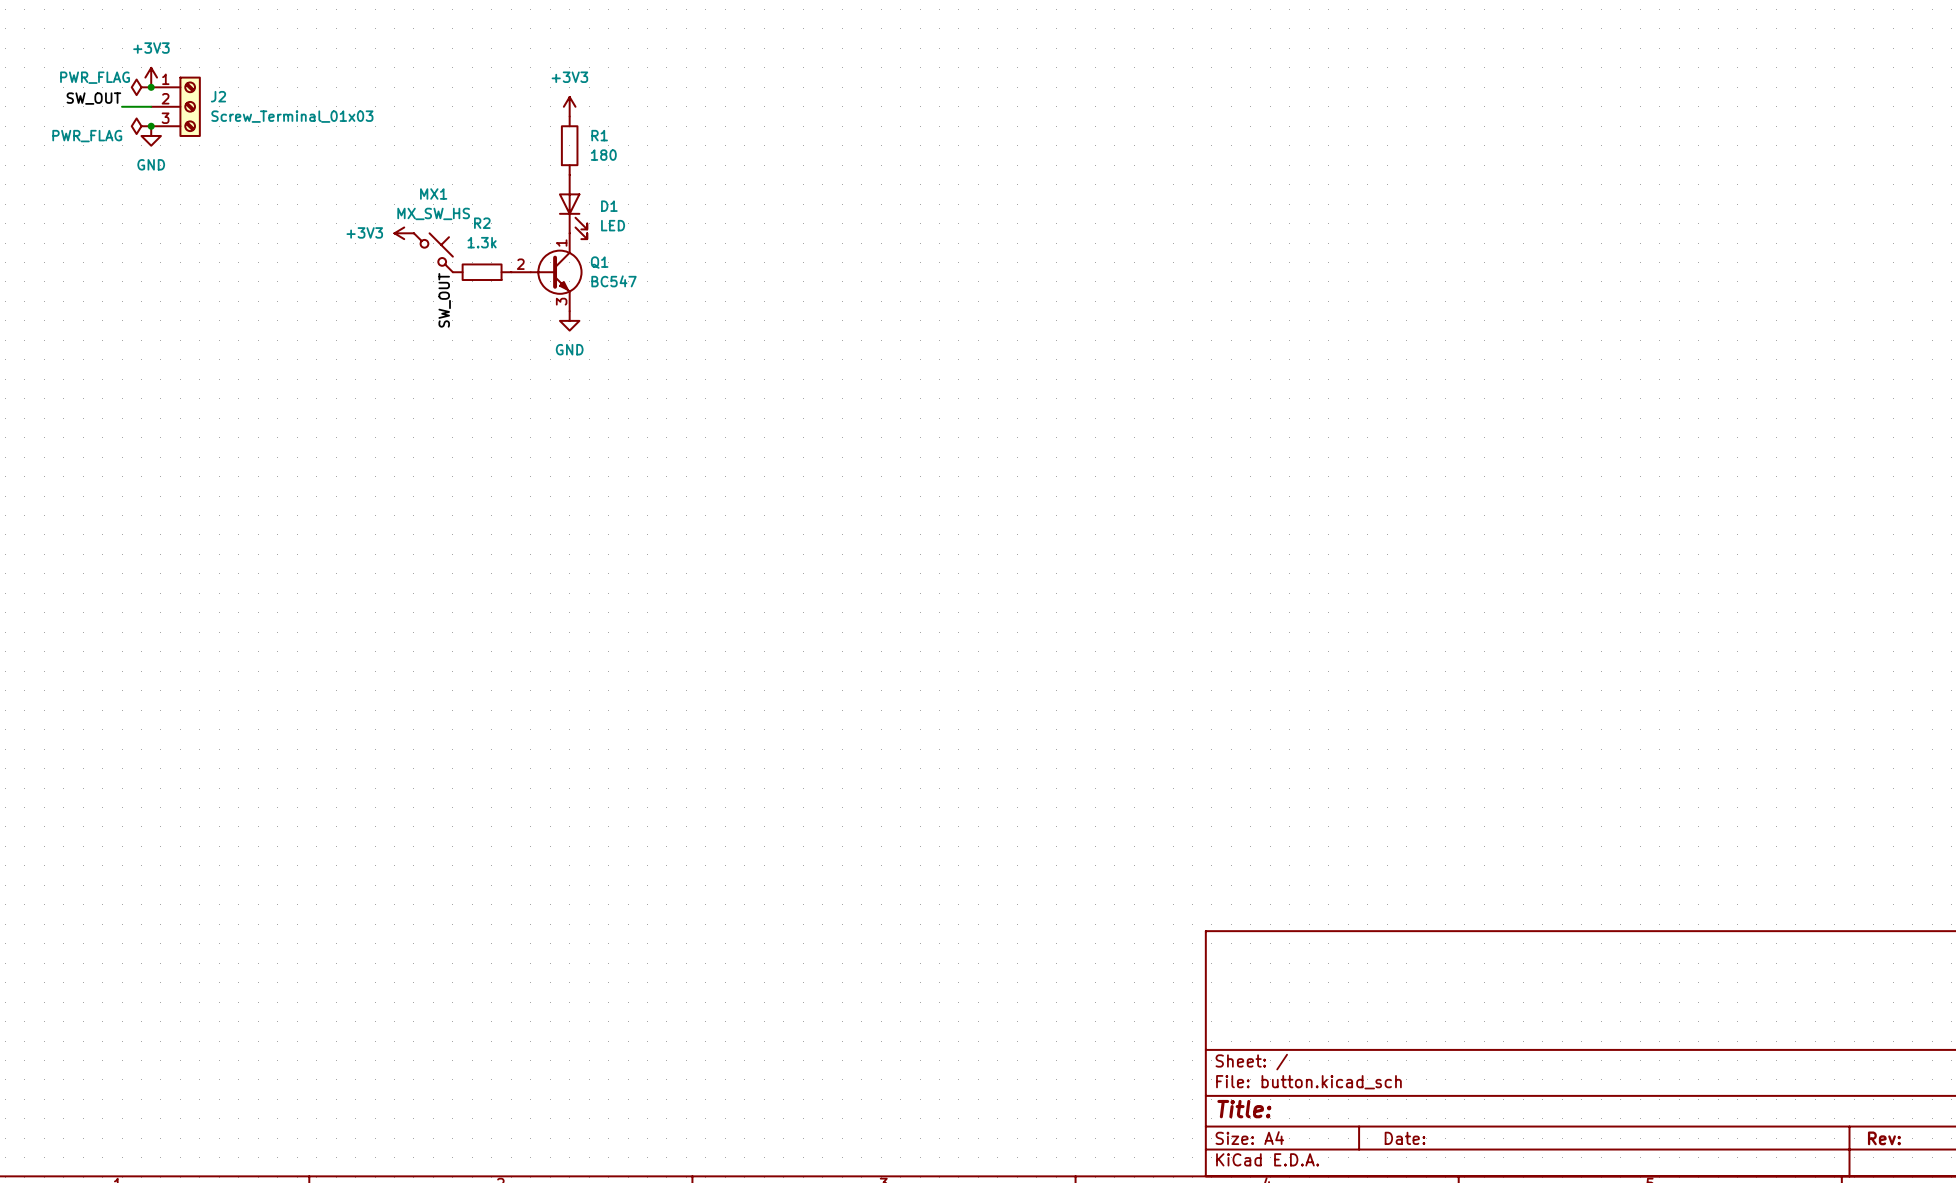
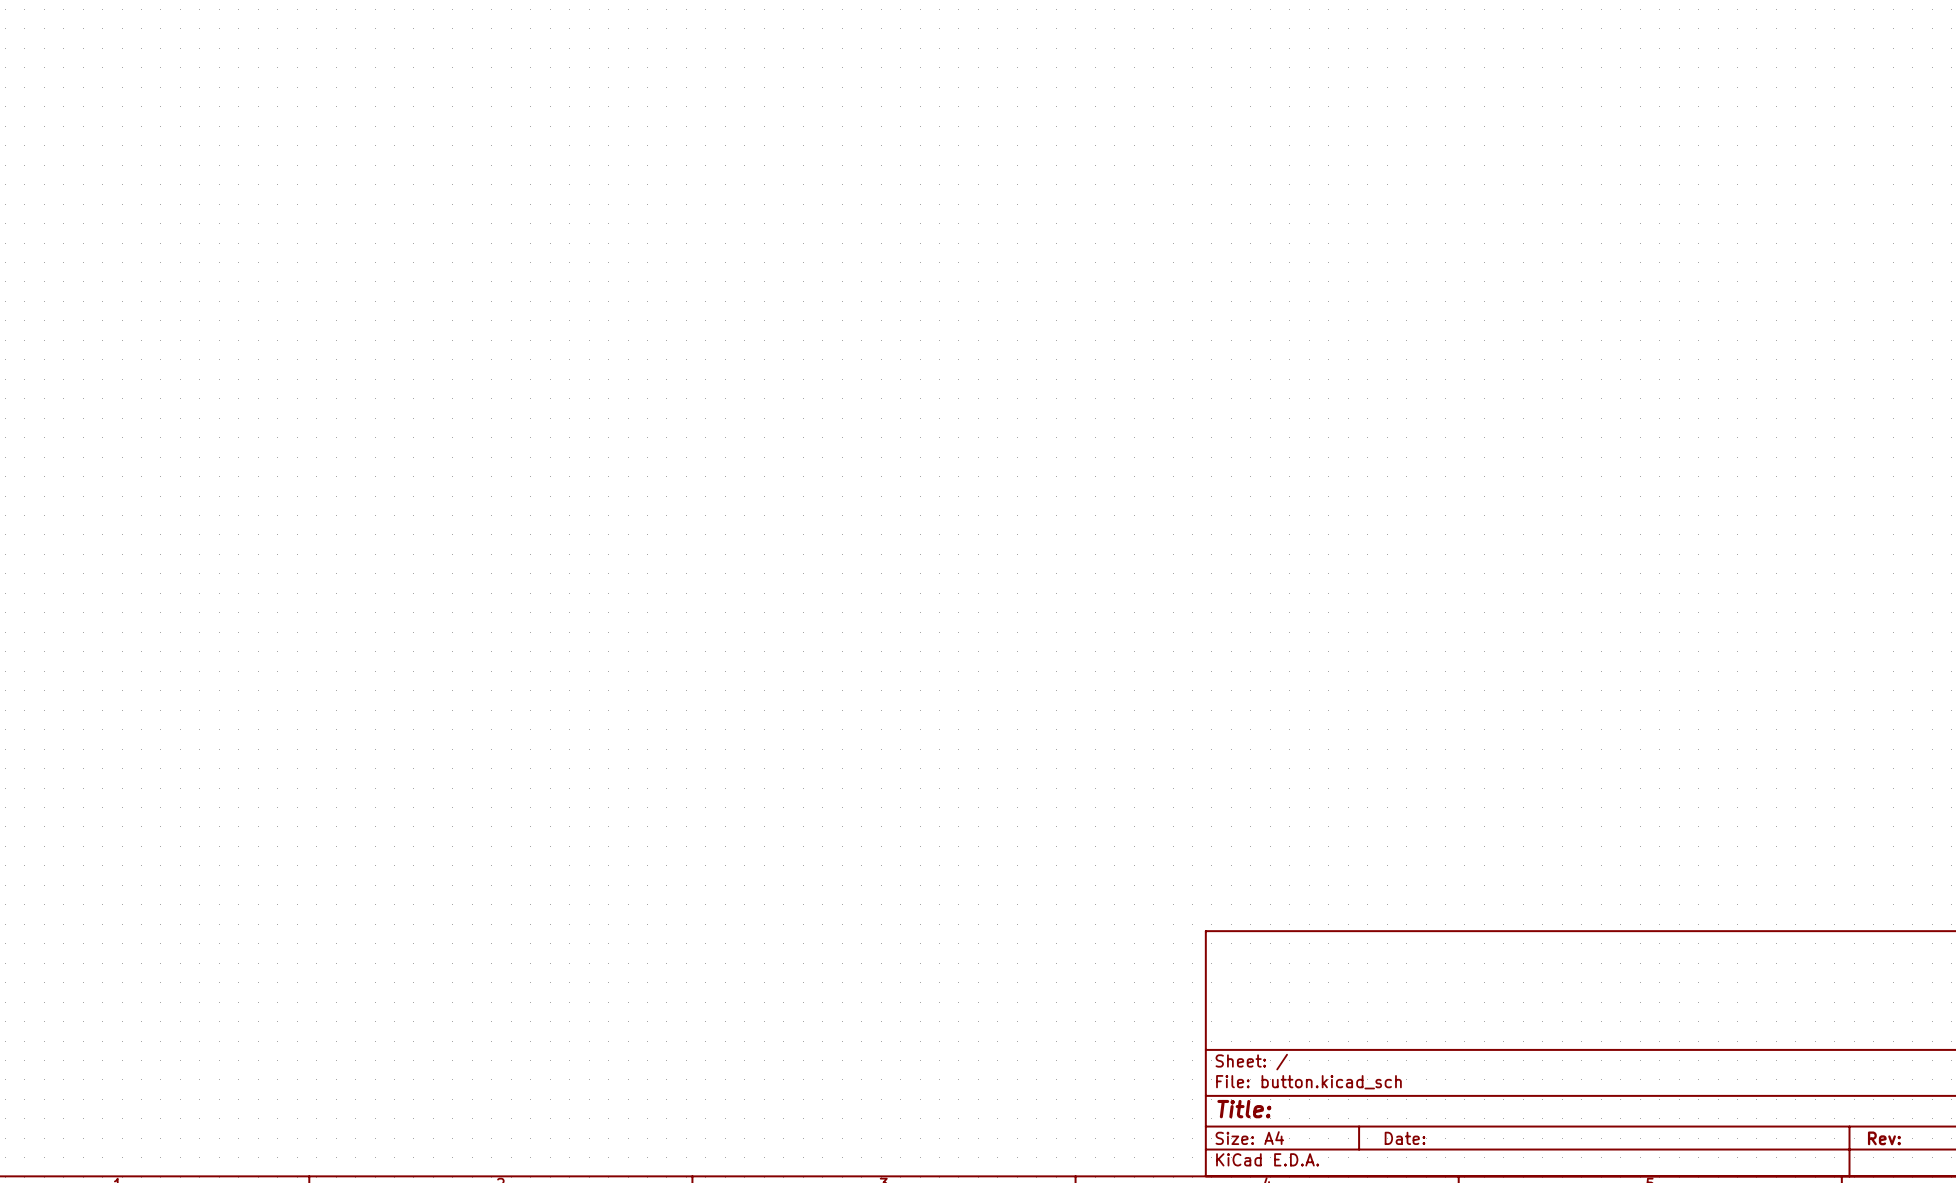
power symbol: +3V3 (151, 77) -> none
power symbol: PWR_FLAG (141, 87) -> none
junction: (151, 87) -> none
label: SW_OUT (93, 98) -> none
wire: (122, 106) (151, 106) -> none
J2: Screw_Terminal_01x03 (176, 106) -> none
power symbol: +3V3 (569, 106) -> none
power symbol: PWR_FLAG (141, 126) -> none
junction: (151, 126) -> none
power symbol: GND (151, 135) -> none
R1: 180 (569, 145) -> none
D1: LED (573, 207) -> none
power symbol: +3V3 (404, 233) -> none
MX1: MX_SW_HS (433, 252) -> none
R2: 1.3k (482, 272) -> none
Q1: BC547 (546, 272) -> none
label: SW_OUT (444, 300) -> none
power symbol: GND (569, 320) -> none

